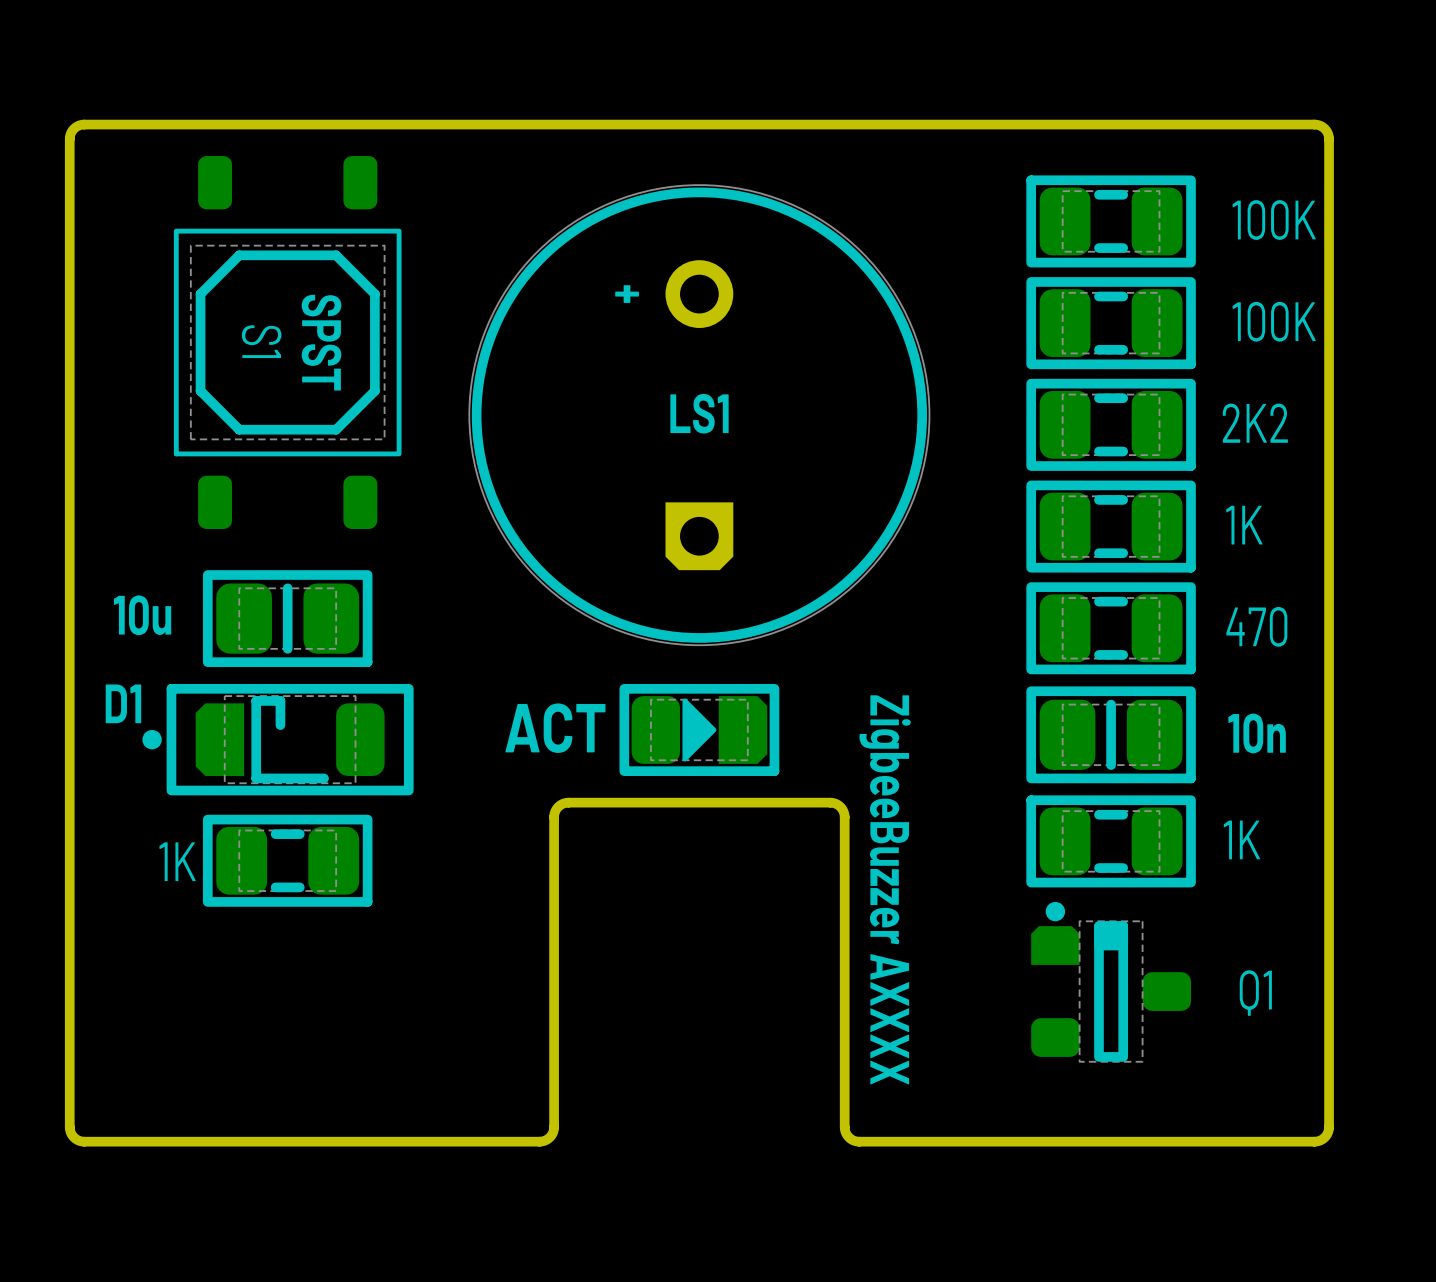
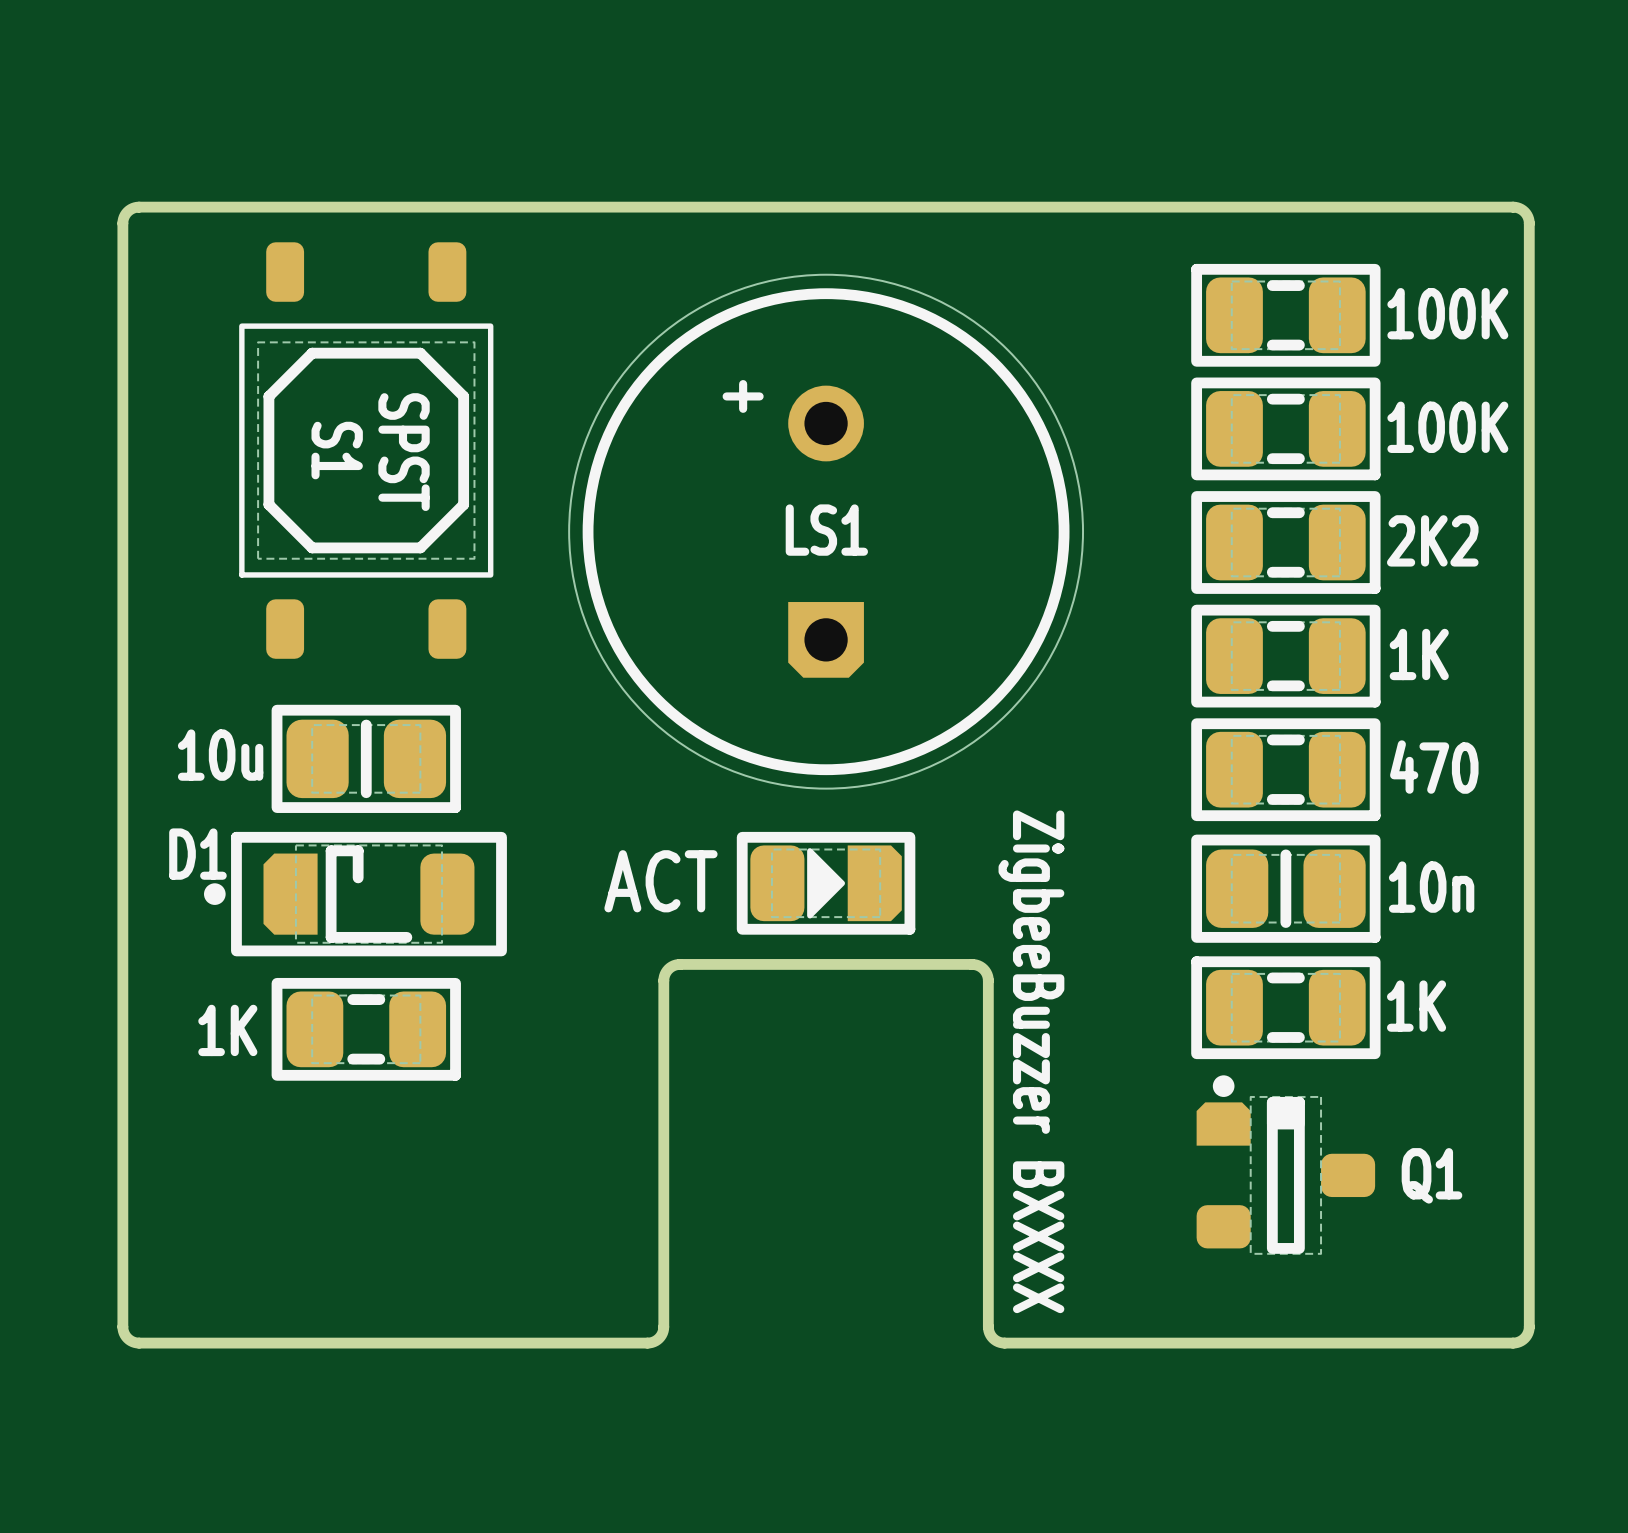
LS1 footprint: [469, 184, 930, 646] -> [568, 274, 1084, 789]
text: ZigbeeBuzzer AXXXX (885, 889) -> ZigbeeBuzzer BXXXX (1031, 1061)

